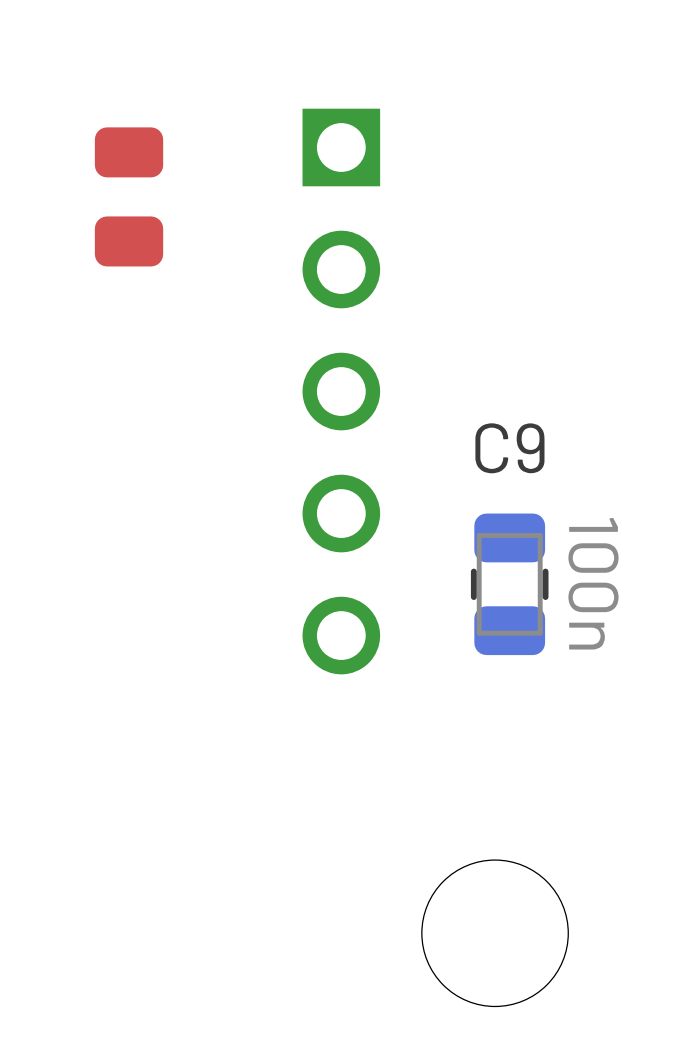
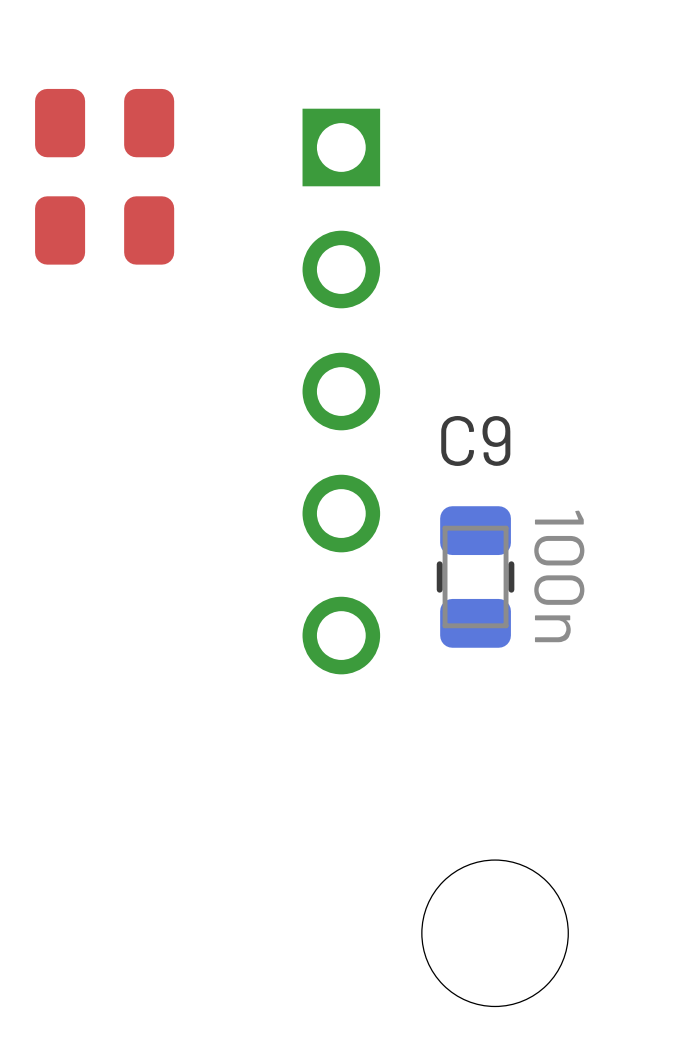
part: none -> (104, 123)
part: (129, 196) -> none
part: none -> (104, 230)
C9 position: (509, 584) -> (475, 576)

